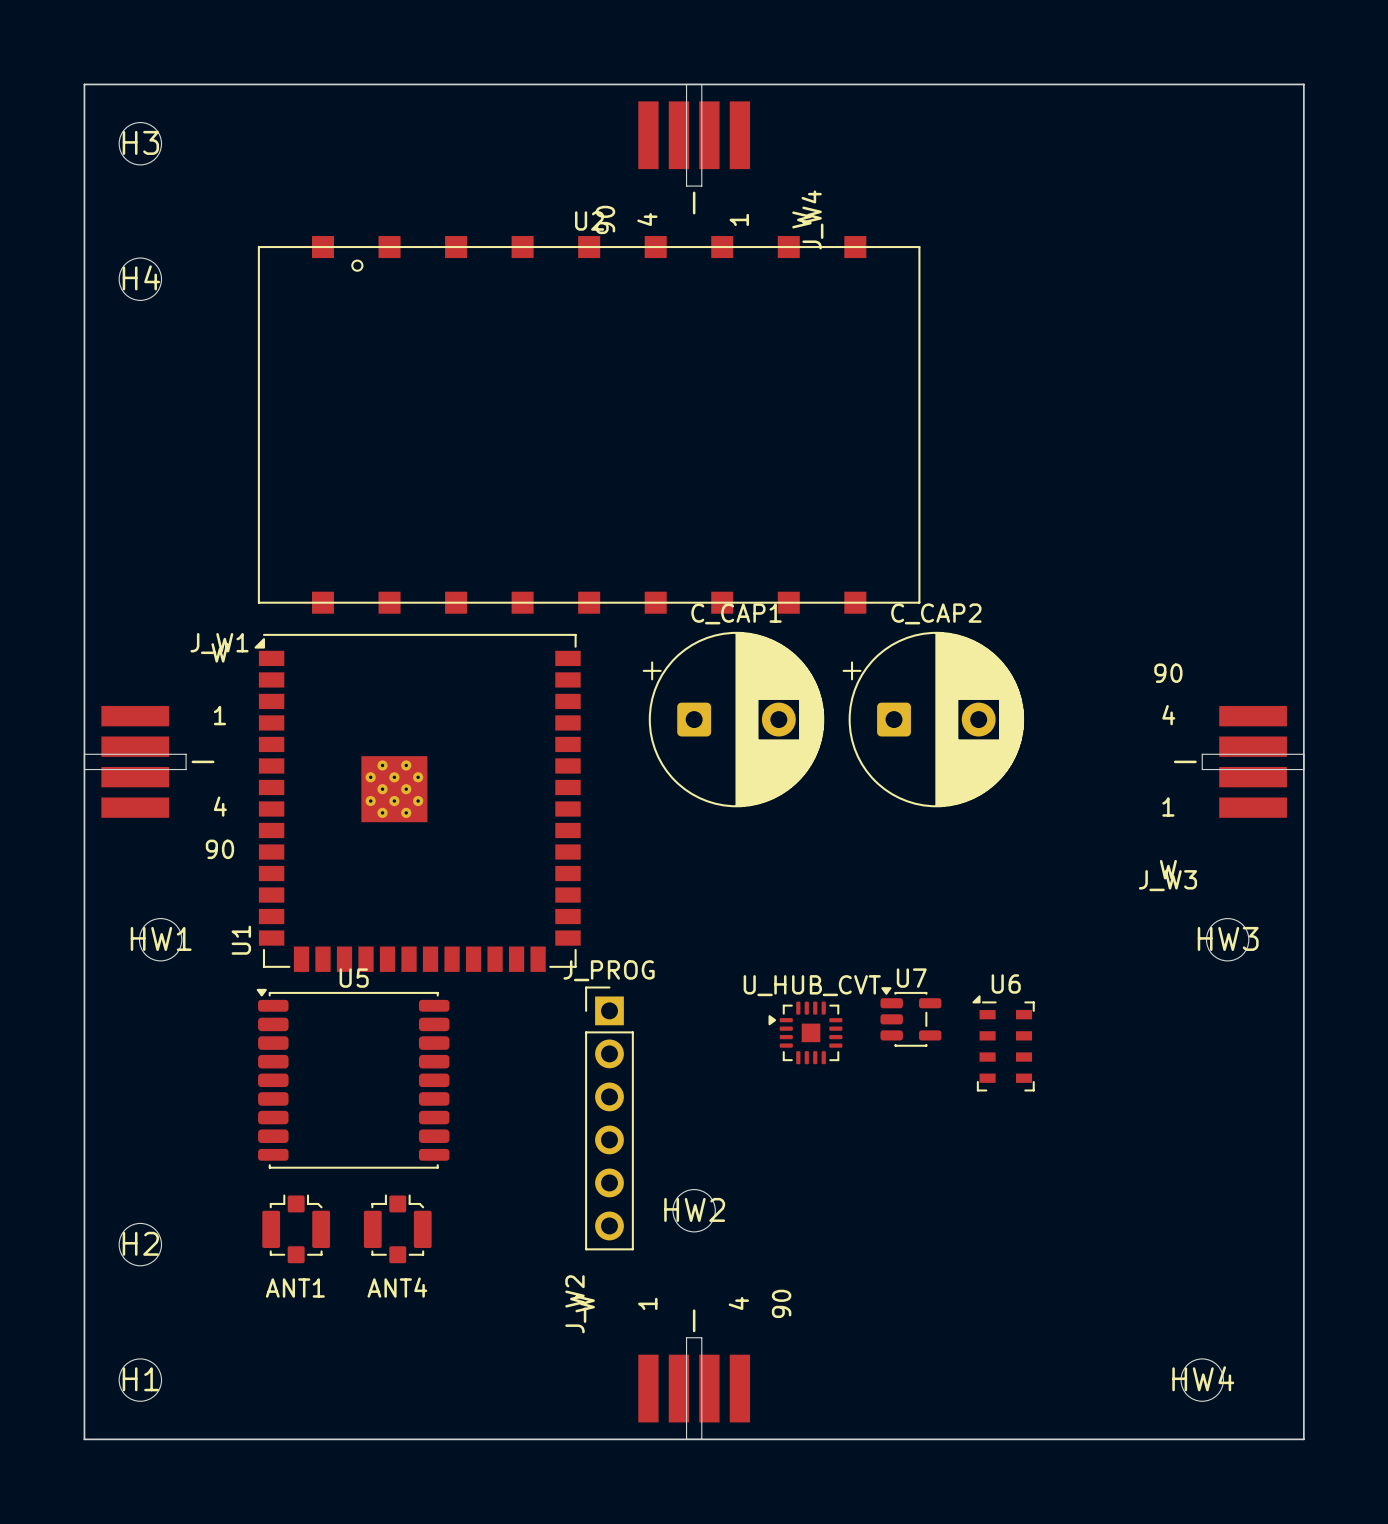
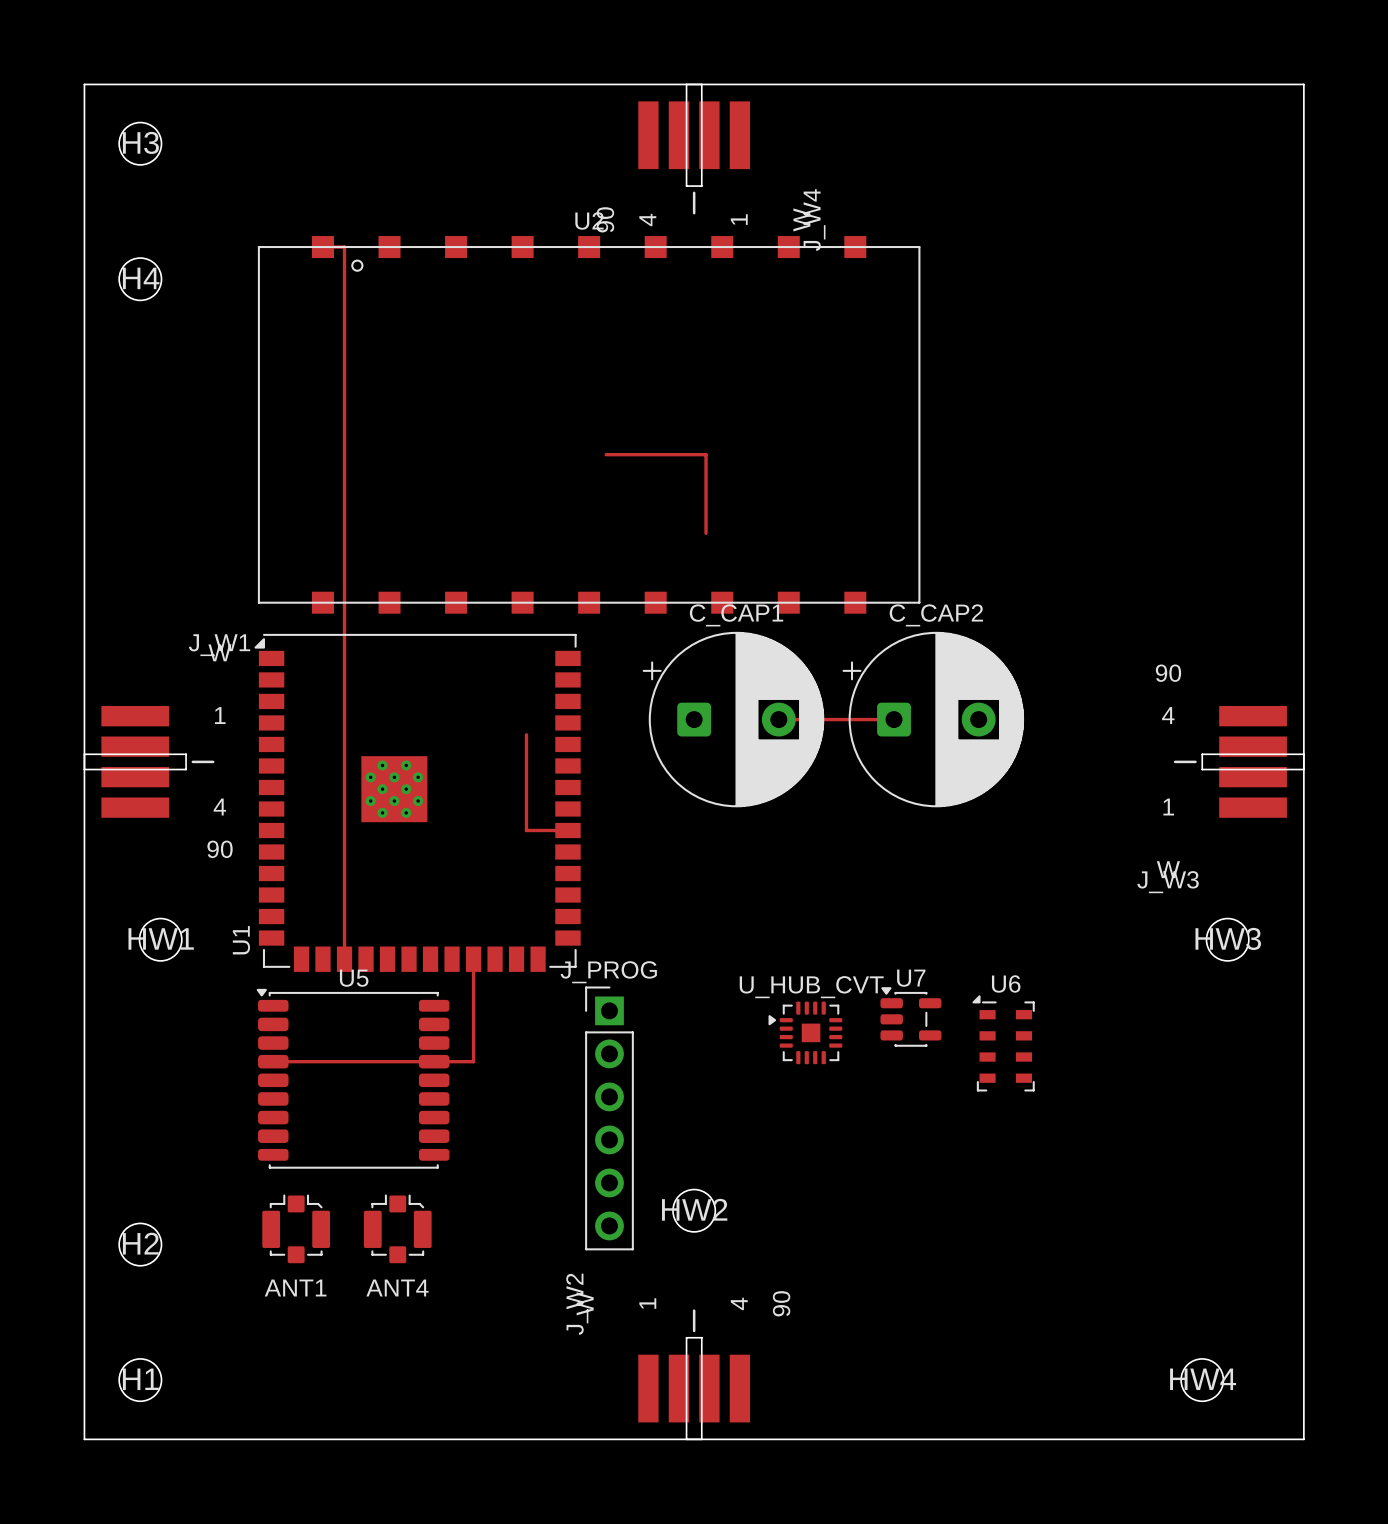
track: none -> (322, 247) (344, 247) (344, 959)
track: none -> (606, 454) (706, 454) (706, 533)
track: none -> (778, 719) (894, 719)
track: none -> (526, 734) (526, 830) (567, 830)
track: none -> (473, 959) (473, 1061) (273, 1061)

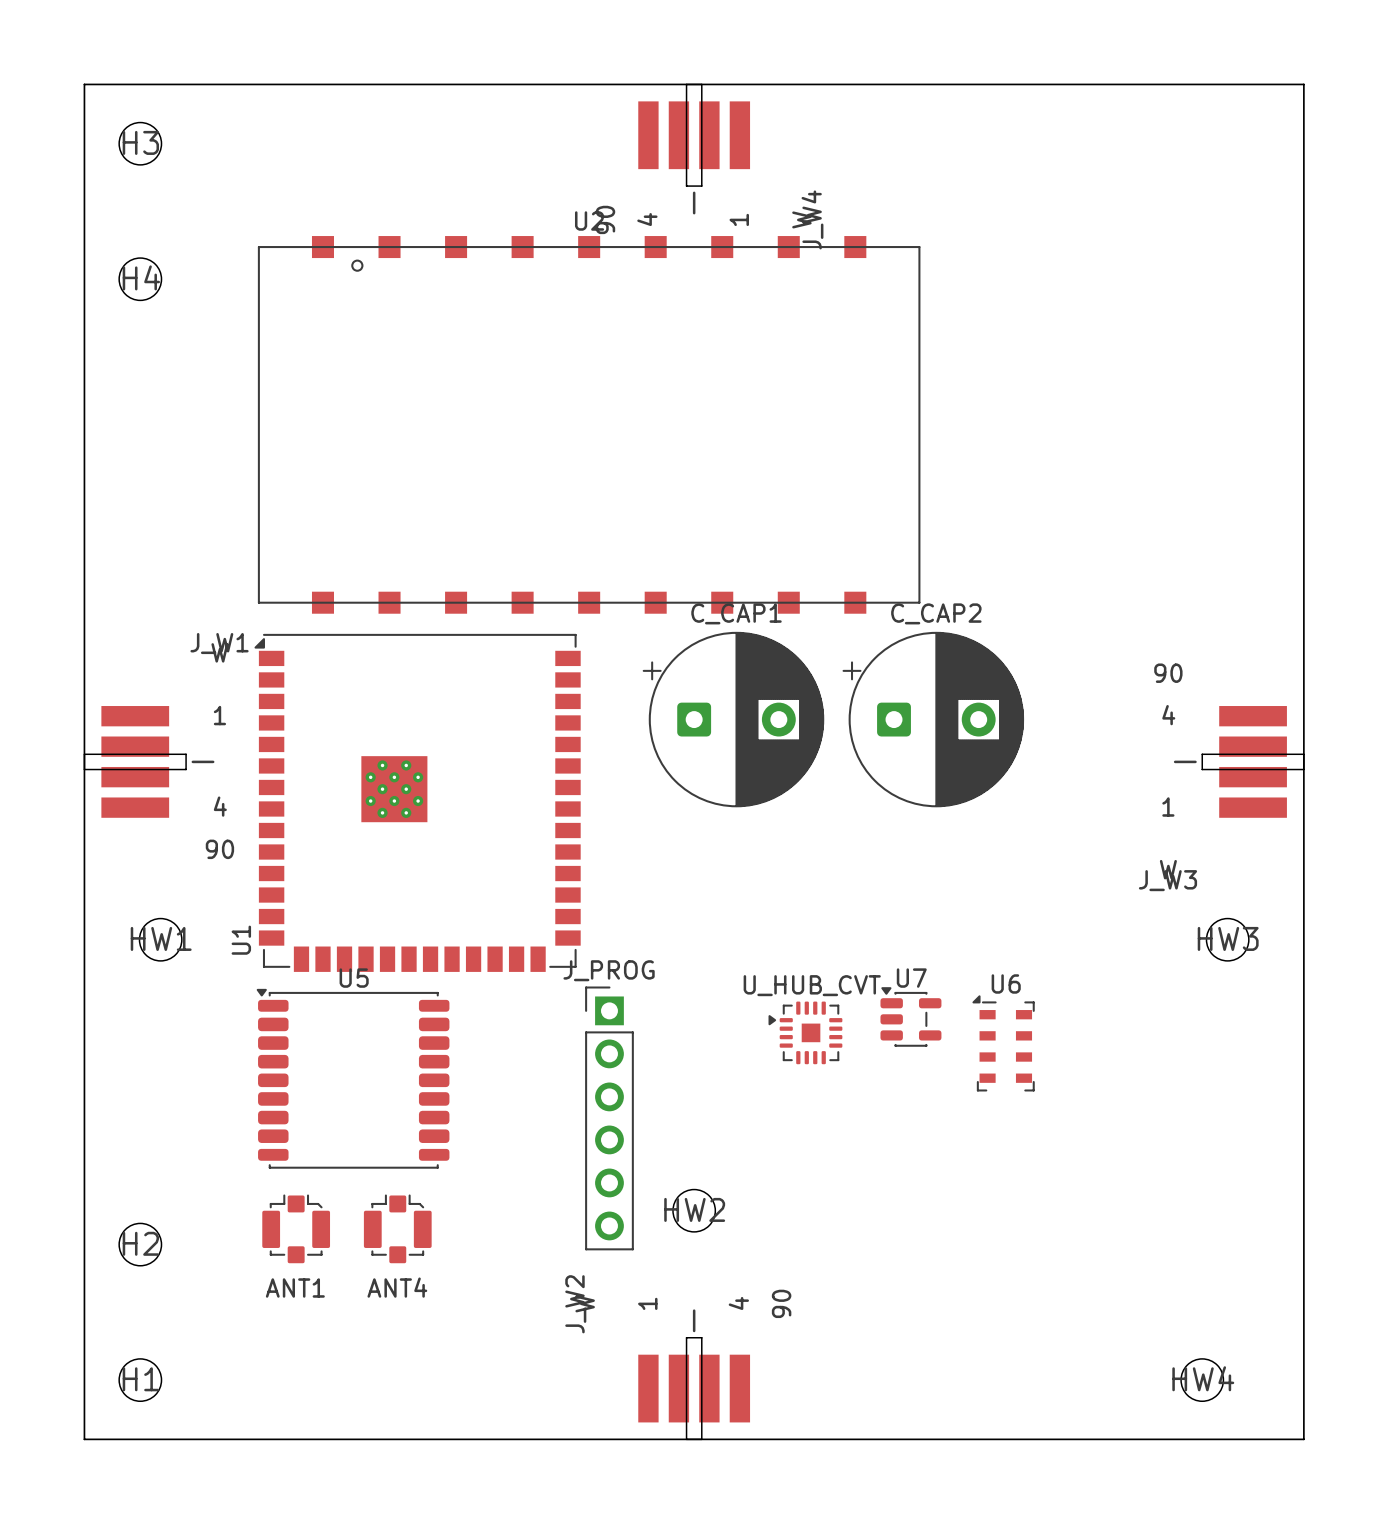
track: (322, 247) (344, 247) (344, 959) -> none
track: (606, 454) (706, 454) (706, 533) -> none
track: (778, 719) (894, 719) -> none
track: (526, 734) (526, 830) (567, 830) -> none
track: (473, 959) (473, 1061) (273, 1061) -> none

